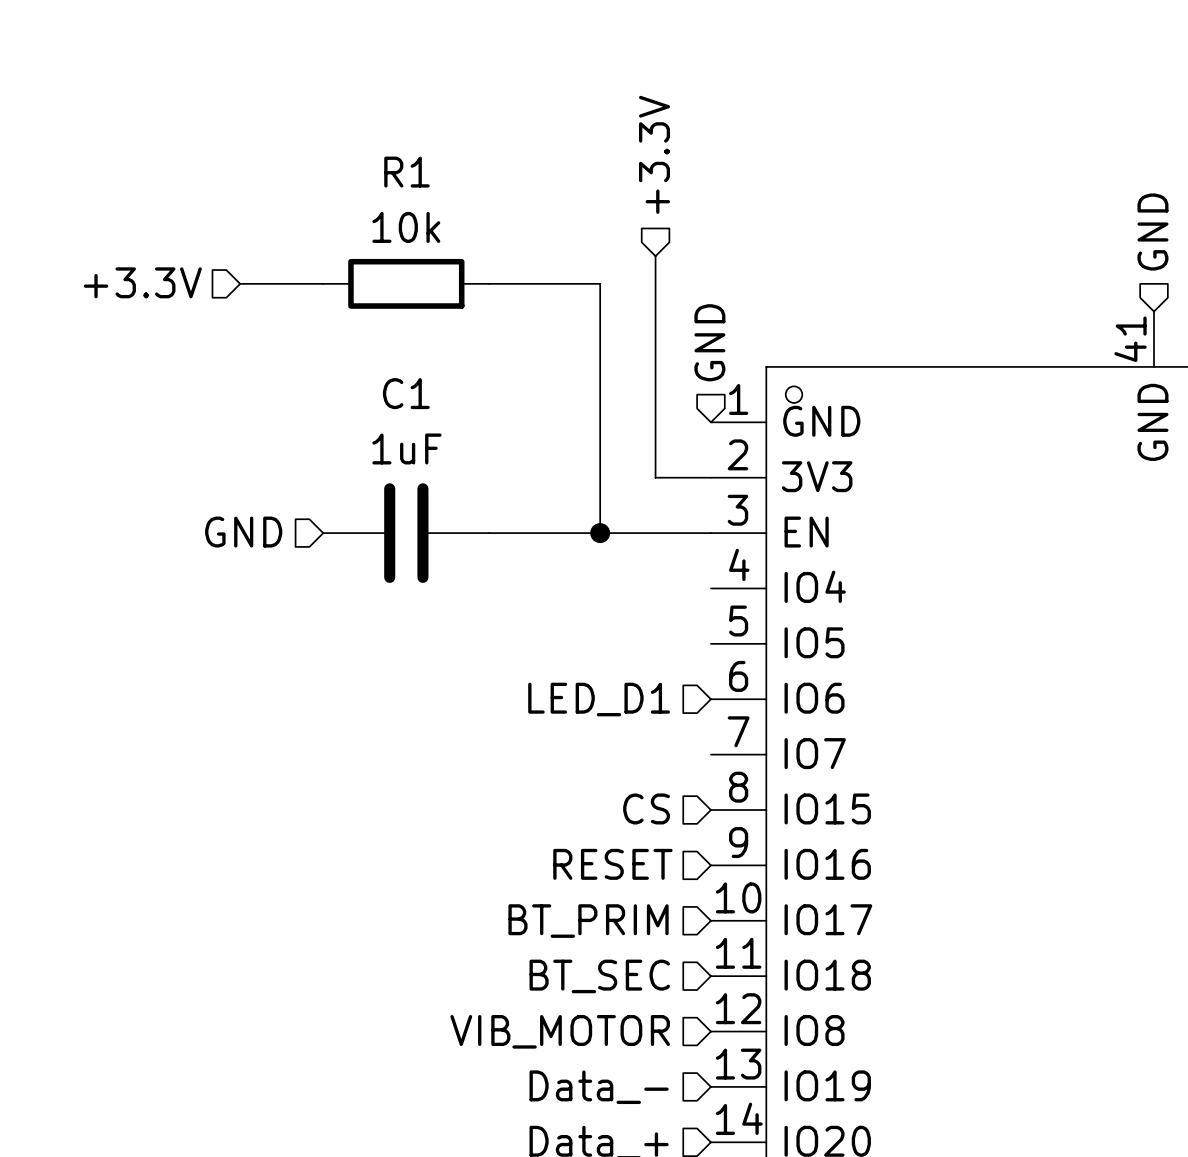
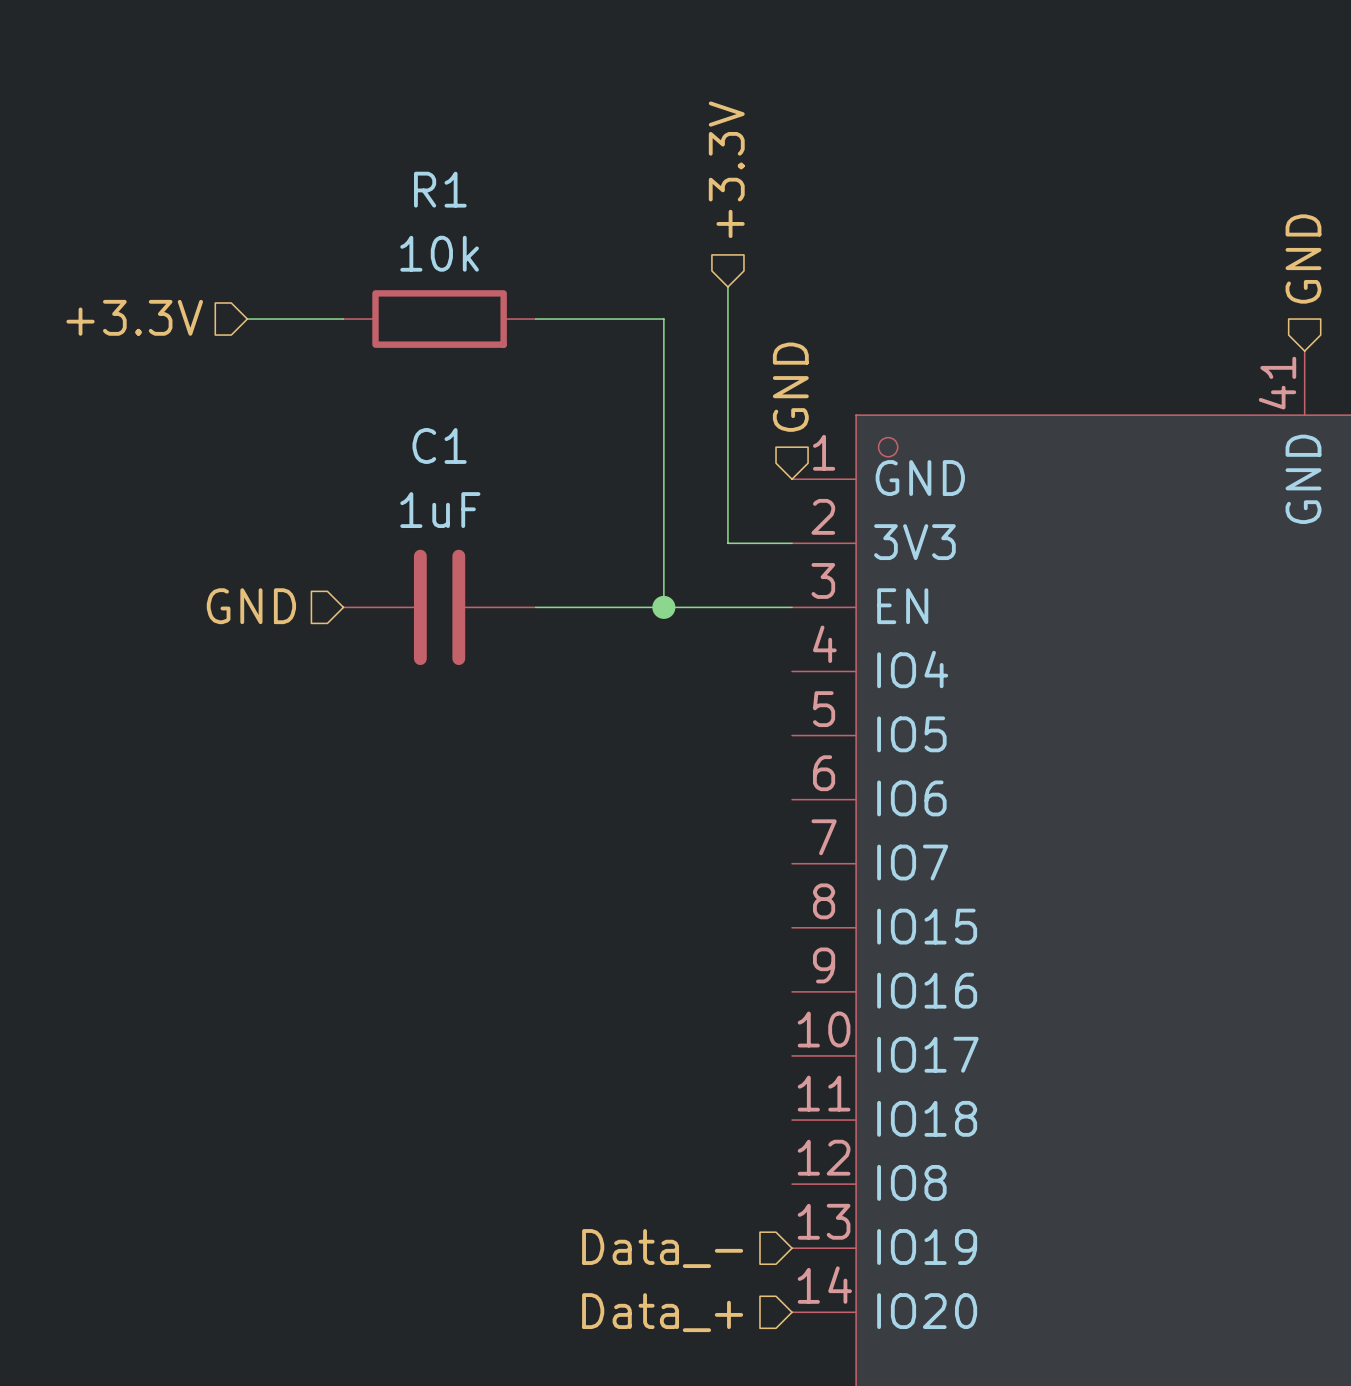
hierarchical label: LED_D1 (599, 699) -> none
hierarchical label: CS (646, 808) -> none
hierarchical label: RESET (612, 864) -> none
hierarchical label: BT_PRIM (588, 921) -> none
hierarchical label: BT_SEC (599, 976) -> none
hierarchical label: VIB_MOTOR (560, 1031) -> none

